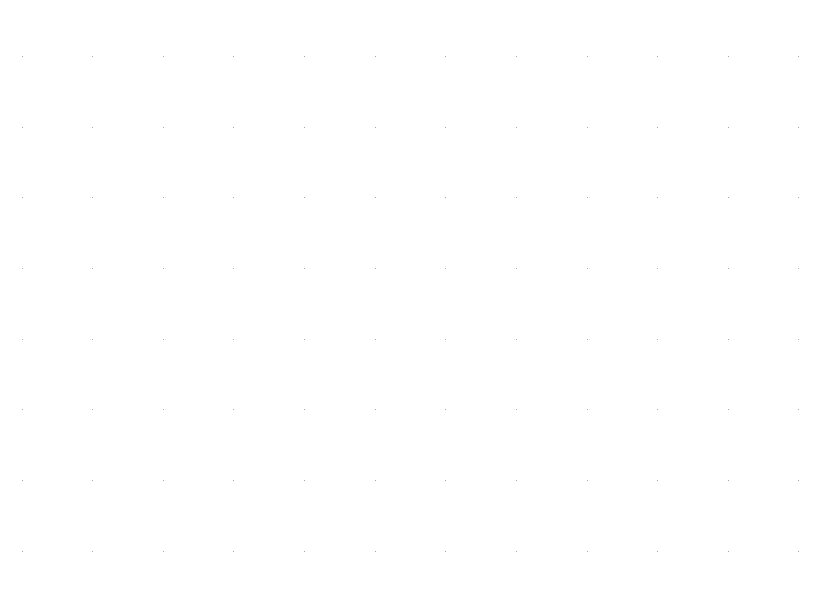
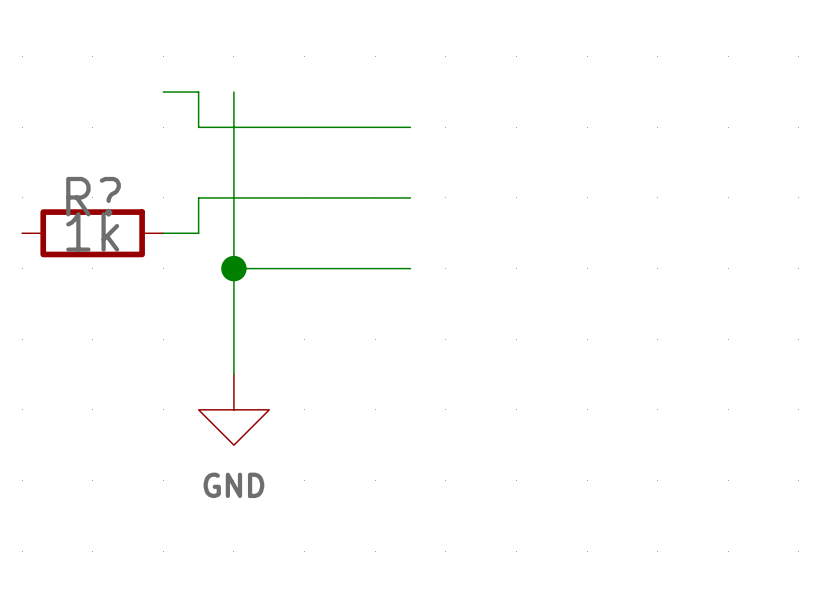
wire: none -> (163, 92) (198, 92) (198, 127) (410, 127)
wire: none -> (233, 92) (233, 374)
wire: none -> (410, 197) (198, 197) (198, 233) (163, 233)
R?: none -> 1k (92, 233)
wire: none -> (233, 268) (410, 268)
junction: none -> (233, 268)
power symbol: none -> GND (233, 409)

